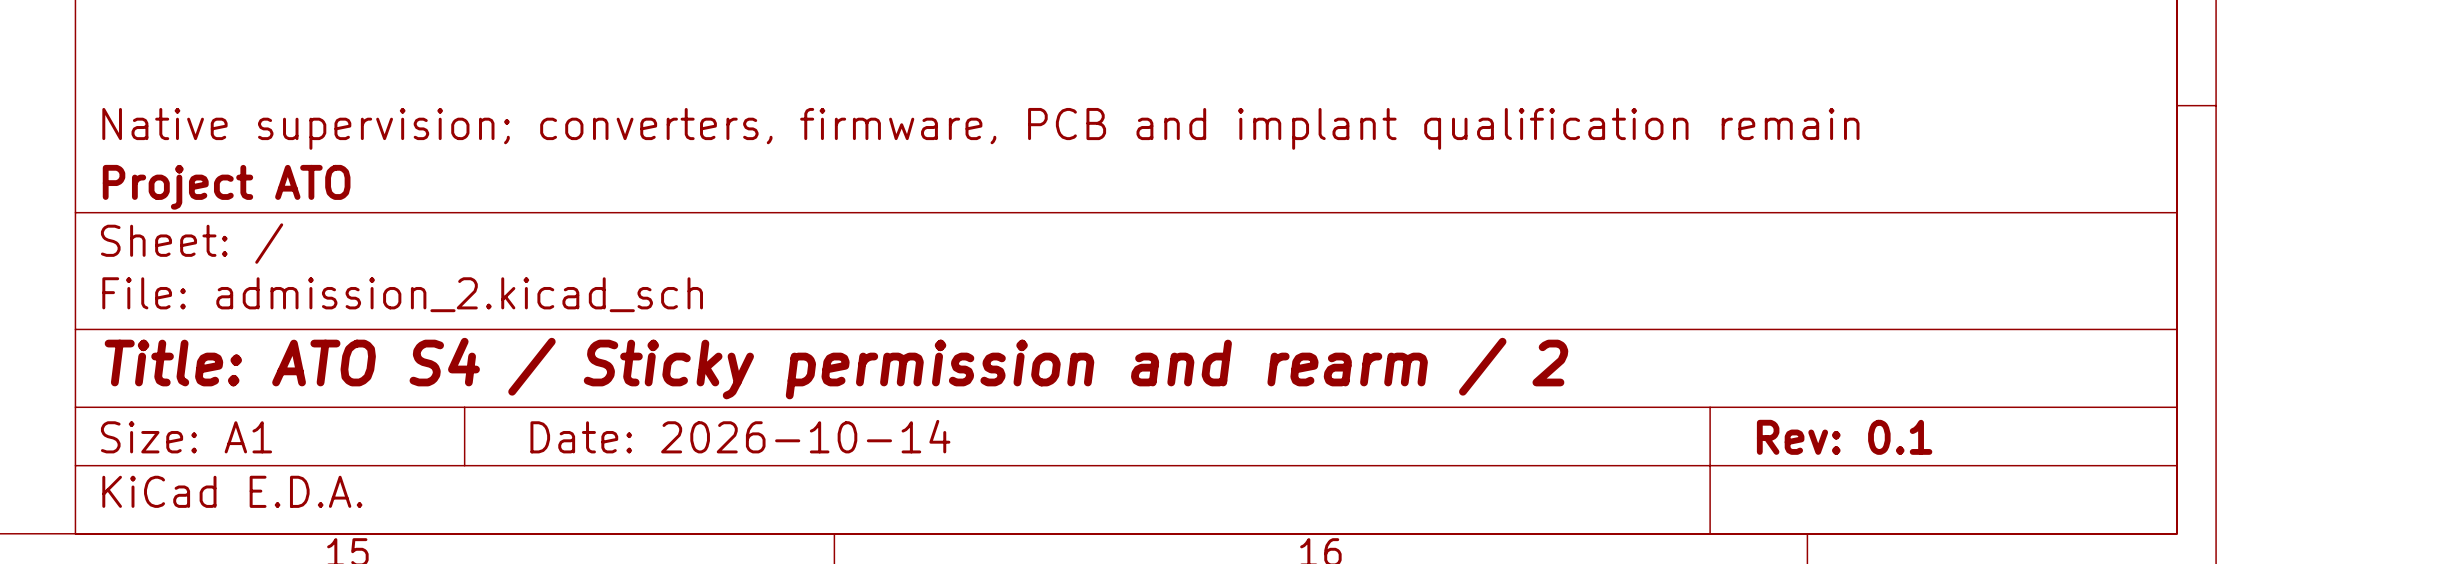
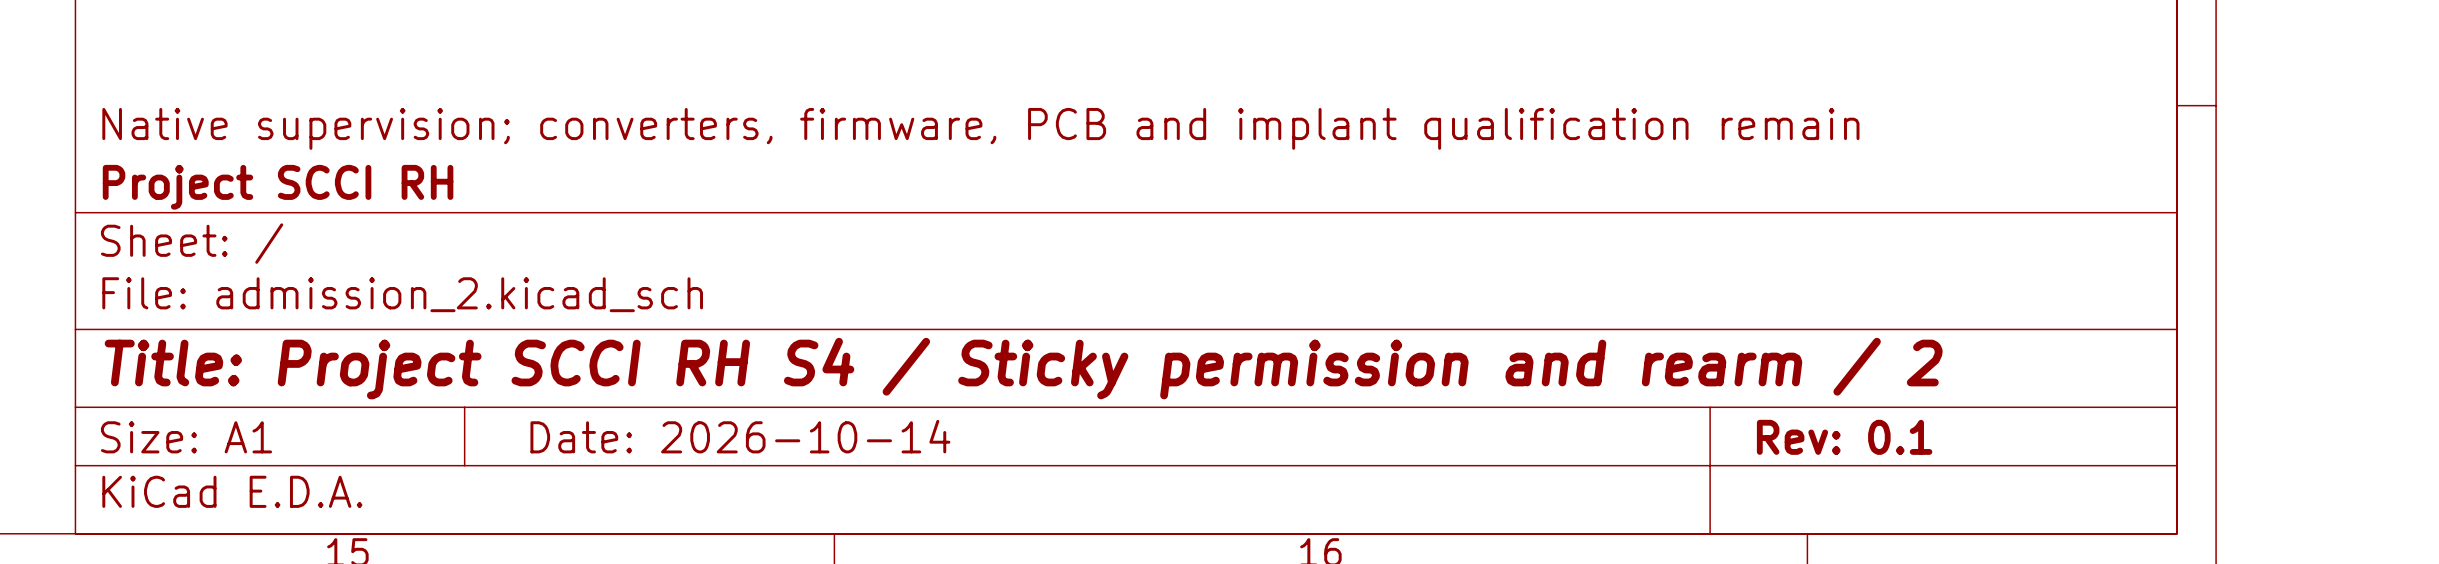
title block: Project ATO (226, 187) -> Project SCCI RH (278, 187)
title block: Title: ATO S4 / Sticky permission and rearm / 2 (836, 368) -> Title: Project SCCI RH S4 / Sticky permission and rearm / 2 (1023, 368)

